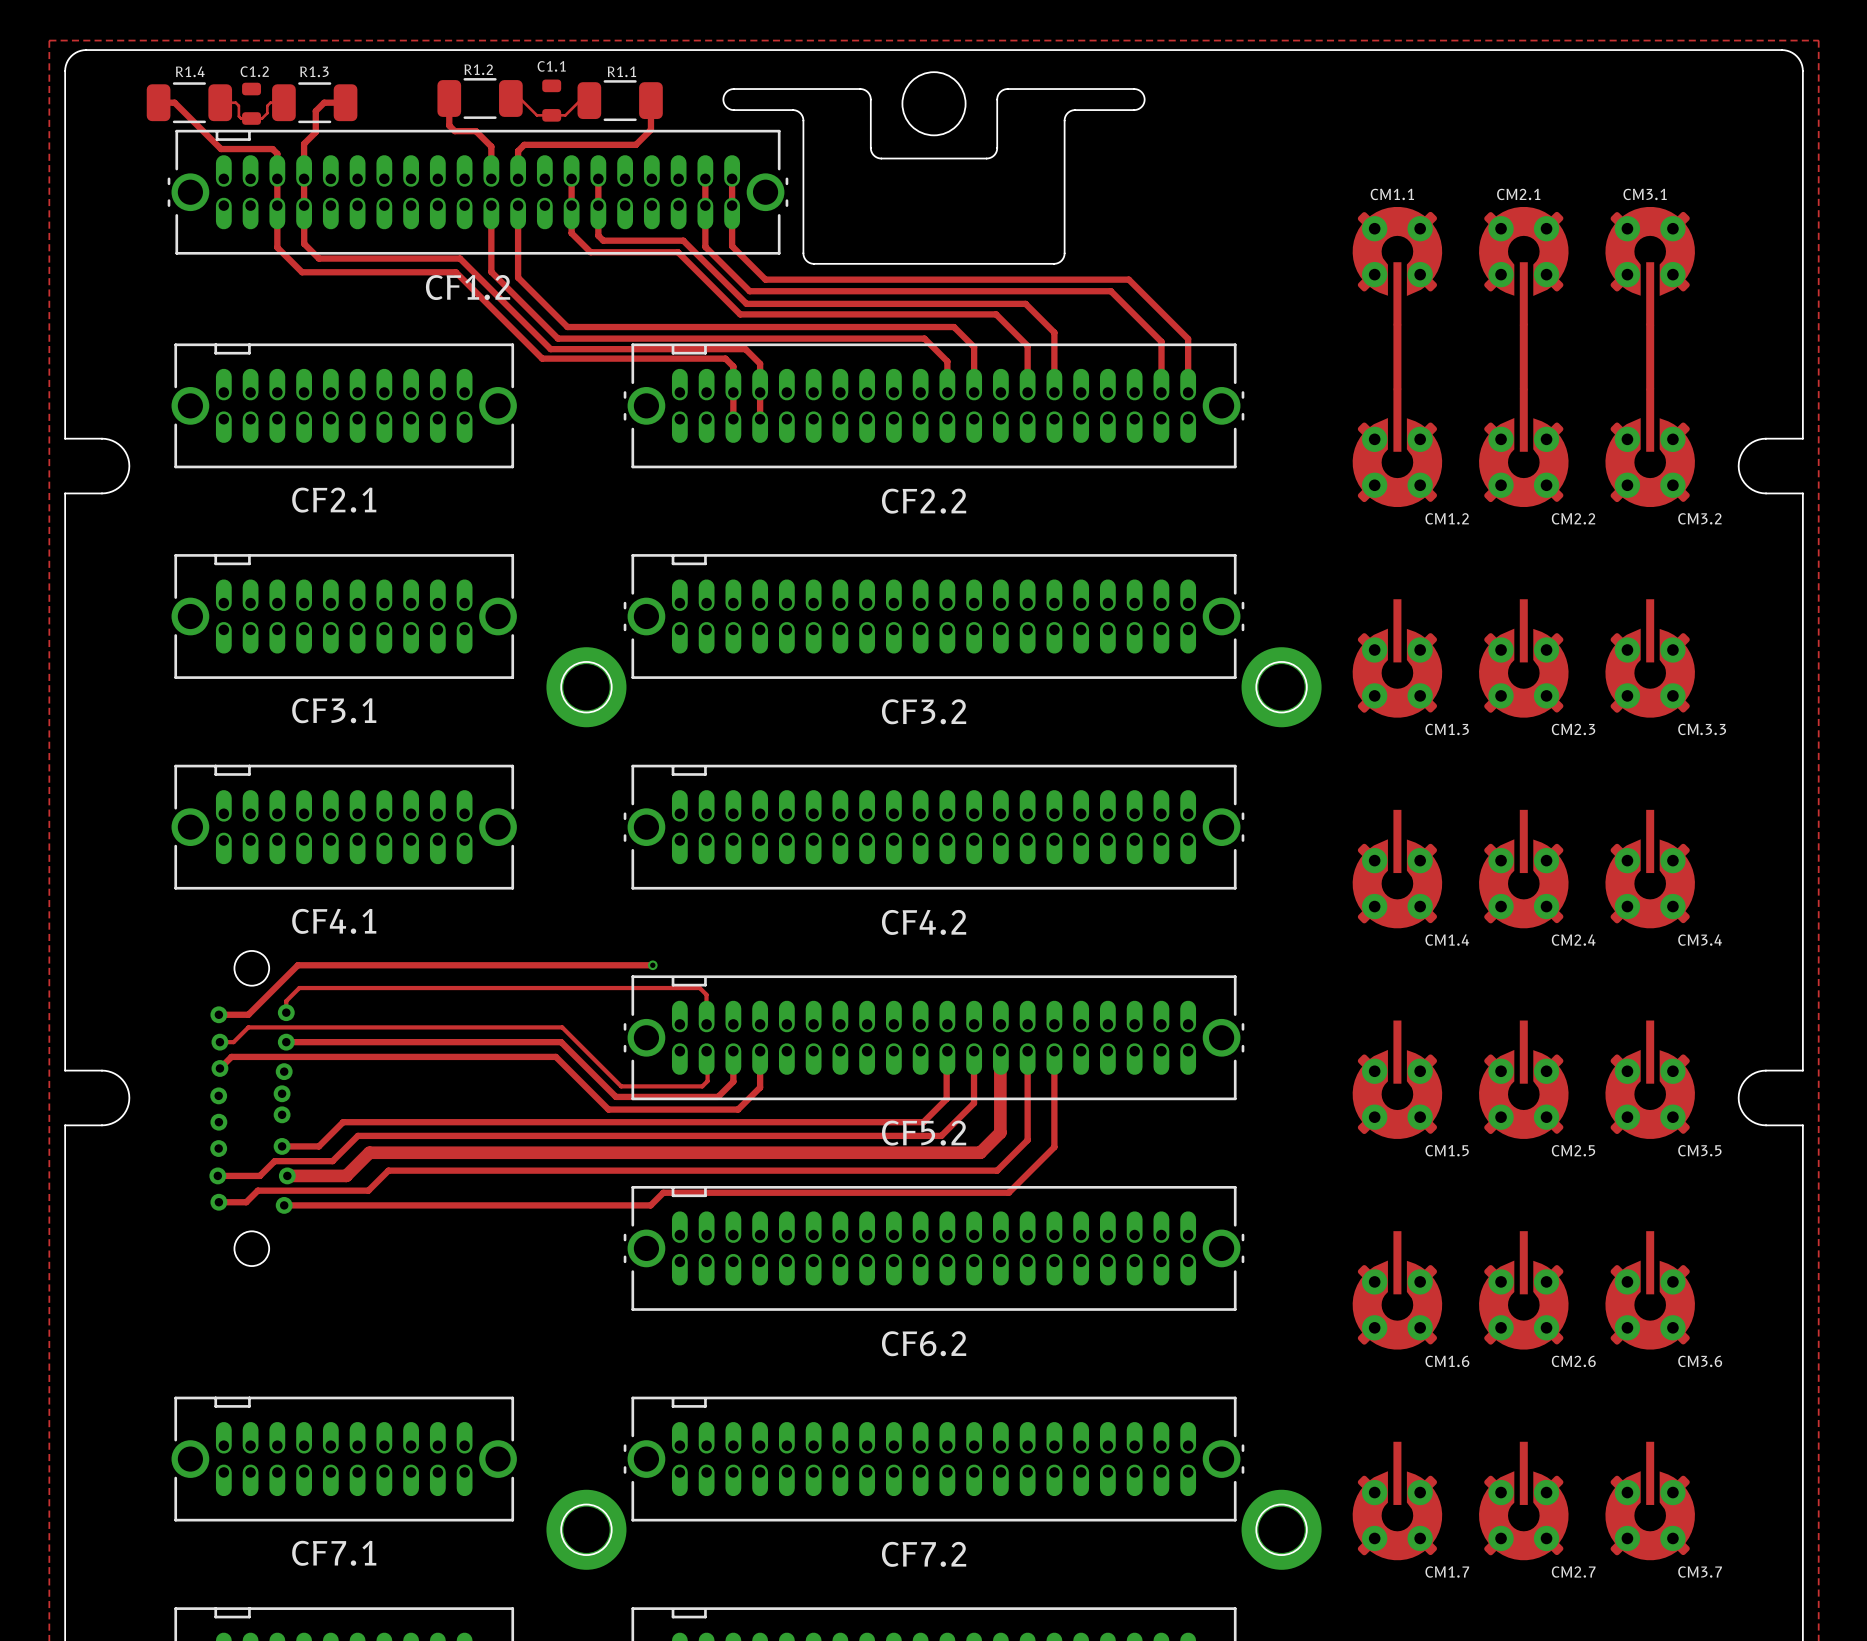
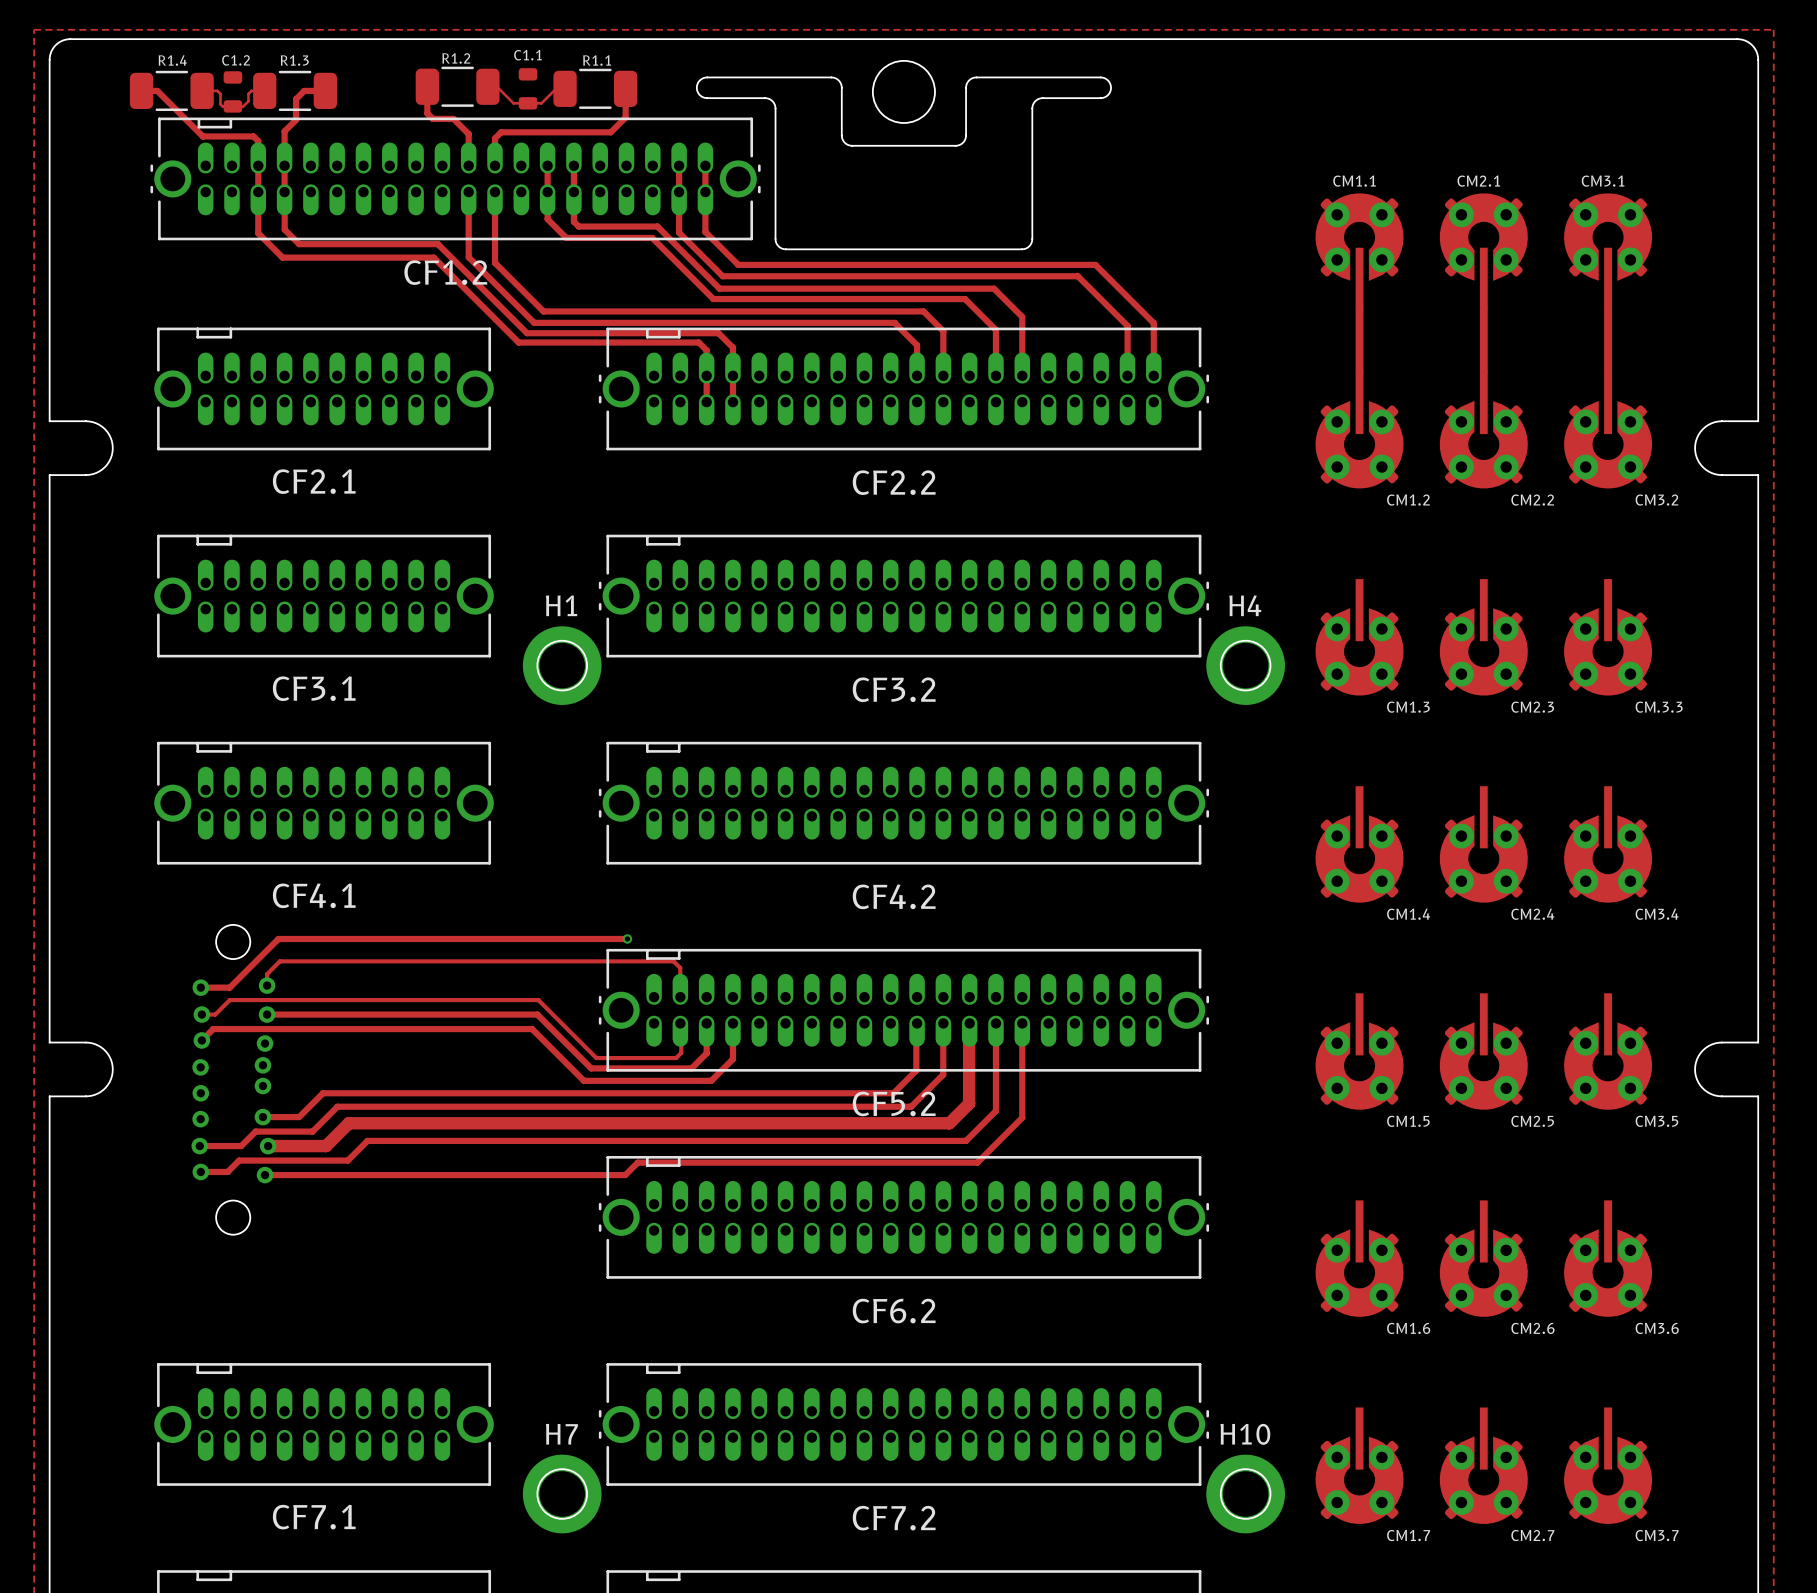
H1 name: none -> H1 (561, 605)
H4 name: none -> H4 (1245, 605)
H7 name: none -> H7 (561, 1434)
H10 name: none -> H10 (1245, 1434)

